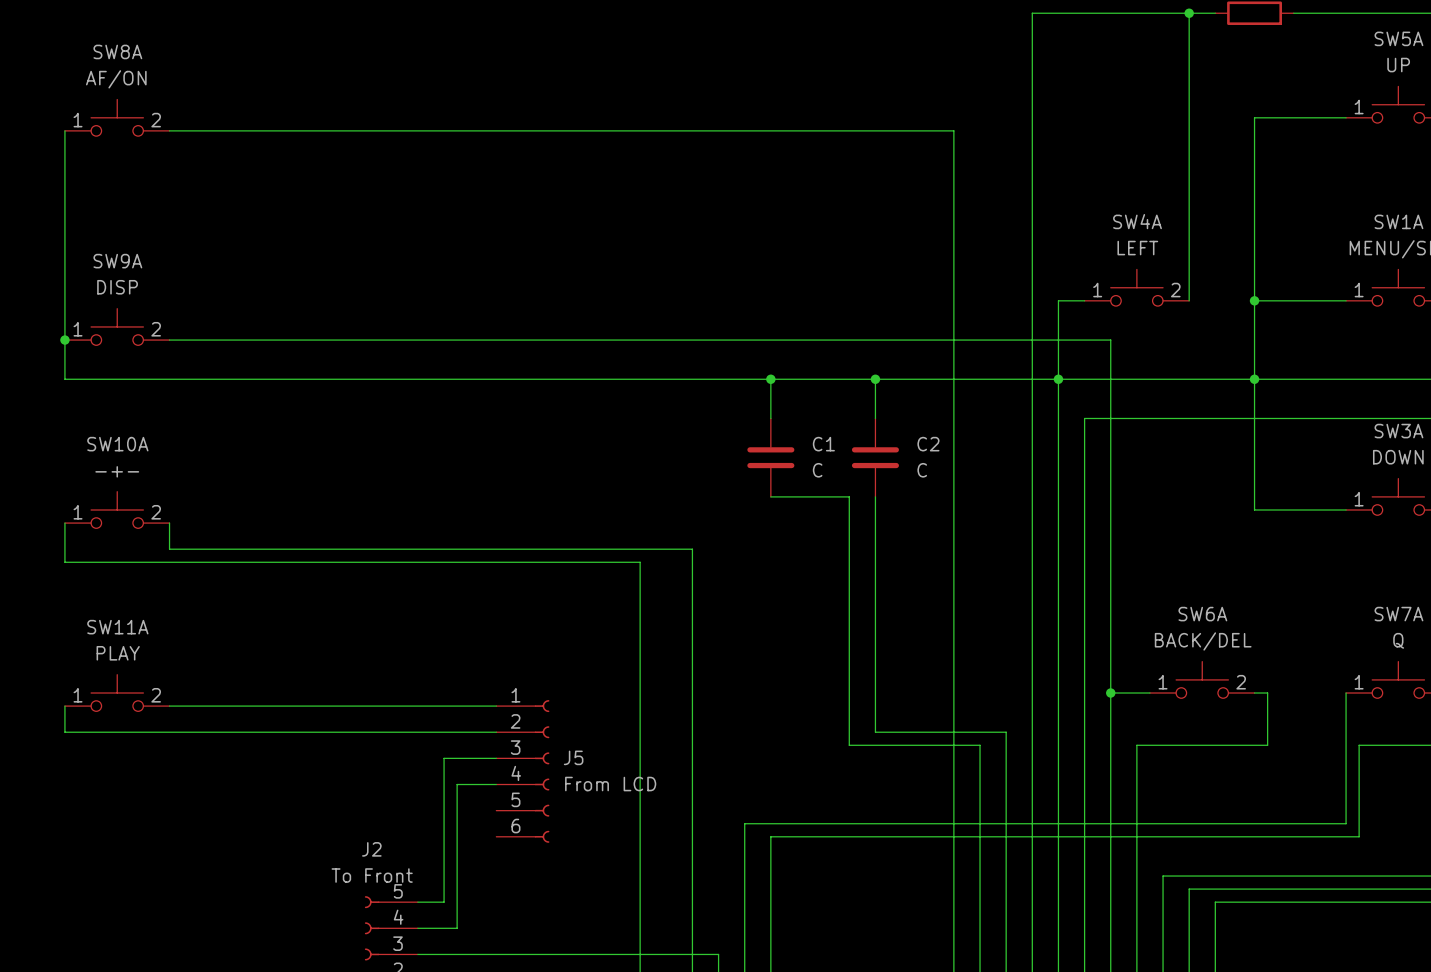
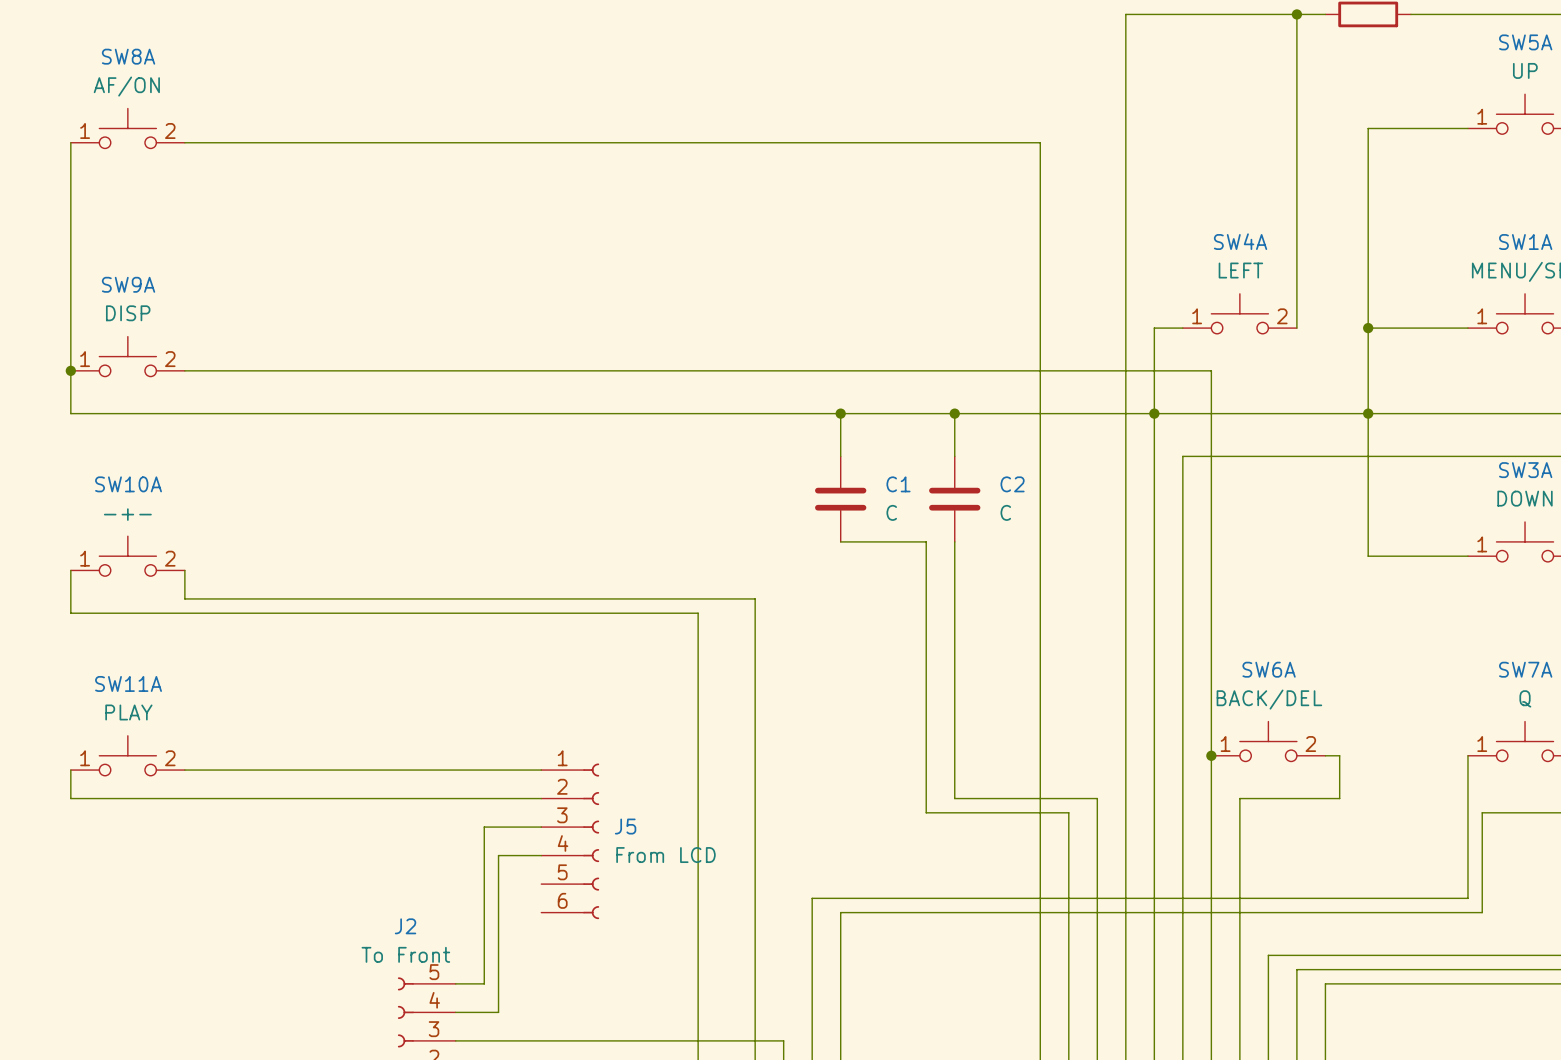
SW6A position: (1202, 679) -> (1268, 741)
wire: (1254, 693) (1267, 693) (1267, 745) (1136, 745) -> (1325, 755) (1339, 755) (1339, 798) (1239, 798) (1239, 812)

